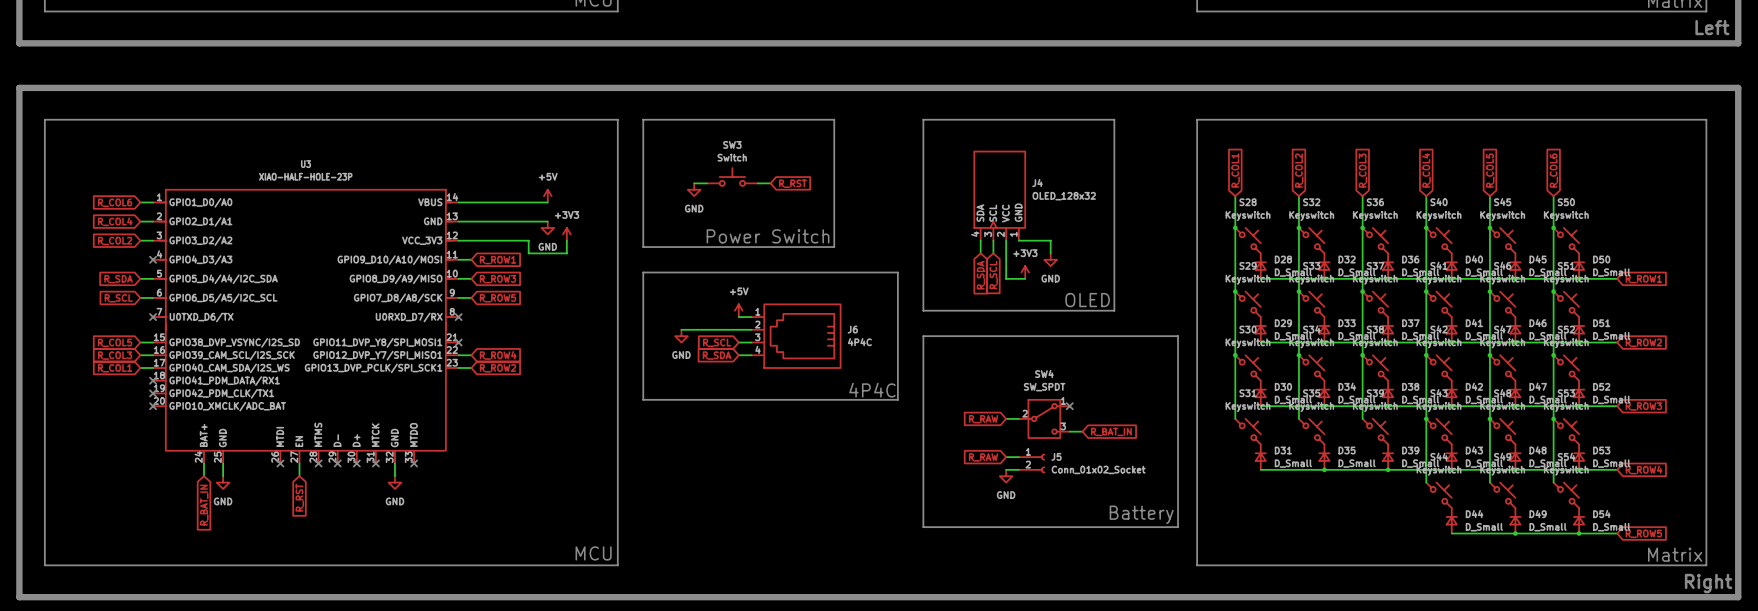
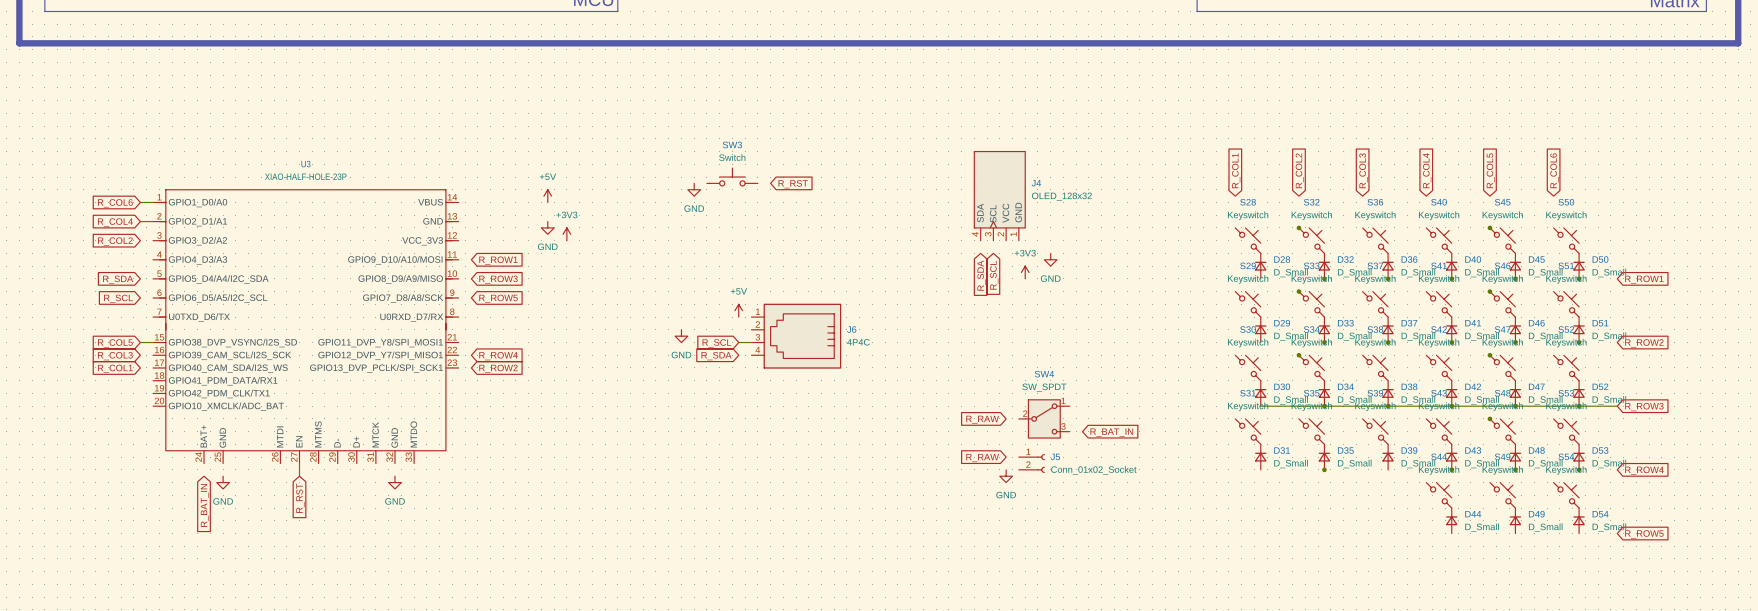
text: Left (1712, 27) -> none
line: (19, 87) (19, 597) (1738, 597) (1738, 87) (19, 87) -> none
line: (44, 119) (44, 565) (617, 565) (617, 119) (44, 119) -> none
line: (643, 119) (834, 119) (834, 247) (643, 247) (643, 119) -> none
line: (923, 119) (1114, 119) (1114, 310) (923, 310) (923, 119) -> none
line: (1197, 119) (1706, 119) (1706, 565) (1197, 565) (1197, 119) -> none
wire: (694, 183) (706, 183) -> none
wire: (757, 183) (770, 183) -> none
wire: (1235, 196) (1235, 418) -> none
wire: (1298, 196) (1298, 418) -> none
wire: (1362, 196) (1362, 418) -> none
wire: (1426, 196) (1426, 482) -> none
wire: (1489, 196) (1489, 482) -> none
wire: (1553, 196) (1553, 482) -> none
wire: (458, 202) (547, 202) -> none
wire: (458, 221) (547, 221) -> none
junction: (1235, 227) -> none
junction: (1362, 227) -> none
junction: (1426, 227) -> none
junction: (1553, 227) -> none
text: Power Switch (768, 236) -> none
wire: (140, 240) (153, 240) -> none
wire: (458, 240) (528, 240) (528, 253) (566, 253) (566, 240) -> none
wire: (980, 240) (980, 253) -> none
wire: (993, 240) (993, 253) -> none
wire: (1006, 240) (1006, 278) (1025, 278) -> none
wire: (1018, 240) (1050, 240) (1050, 253) -> none
no-connect mark: (153, 259) -> none
wire: (458, 259) (471, 259) -> none
line: (643, 272) (643, 399) (897, 399) (897, 272) (643, 272) -> none
wire: (140, 278) (153, 278) -> none
wire: (458, 278) (471, 278) -> none
wire: (1260, 278) (1617, 278) -> none
junction: (1235, 291) -> none
junction: (1362, 291) -> none
junction: (1426, 291) -> none
junction: (1553, 291) -> none
wire: (140, 297) (153, 297) -> none
wire: (458, 297) (471, 297) -> none
text: OLED (1087, 300) -> none
no-connect mark: (153, 317) -> none
no-connect mark: (458, 317) -> none
wire: (738, 317) (751, 317) -> none
wire: (681, 329) (751, 329) -> none
line: (923, 336) (923, 527) (1178, 527) (1178, 336) (923, 336) -> none
no-connect mark: (458, 342) -> none
wire: (1260, 342) (1617, 342) -> none
wire: (140, 355) (153, 355) -> none
wire: (458, 355) (471, 355) -> none
wire: (738, 355) (751, 355) -> none
junction: (1235, 355) -> none
junction: (1362, 355) -> none
junction: (1426, 355) -> none
junction: (1553, 355) -> none
wire: (140, 367) (153, 367) -> none
wire: (458, 367) (471, 367) -> none
no-connect mark: (153, 380) -> none
text: 4P4C (872, 390) -> none
no-connect mark: (153, 393) -> none
no-connect mark: (153, 406) -> none
no-connect mark: (1069, 406) -> none
wire: (1006, 418) (1018, 418) -> none
junction: (1426, 418) -> none
junction: (1553, 418) -> none
wire: (1069, 431) (1082, 431) -> none
wire: (1006, 457) (1018, 457) -> none
wire: (204, 463) (204, 476) -> none
wire: (223, 463) (223, 476) -> none
no-connect mark: (280, 463) -> none
no-connect mark: (318, 463) -> none
no-connect mark: (337, 463) -> none
no-connect mark: (356, 463) -> none
no-connect mark: (375, 463) -> none
wire: (394, 463) (394, 476) -> none
no-connect mark: (414, 463) -> none
wire: (1006, 469) (1018, 469) -> none
wire: (1260, 469) (1617, 469) -> none
junction: (1388, 469) -> none
text: Battery (1141, 514) -> none
wire: (1451, 533) (1617, 533) -> none
junction: (1515, 533) -> none
junction: (1579, 533) -> none
text: MCU (593, 553) -> none
text: Matrix (1675, 554) -> none
text: Right (1708, 583) -> none

